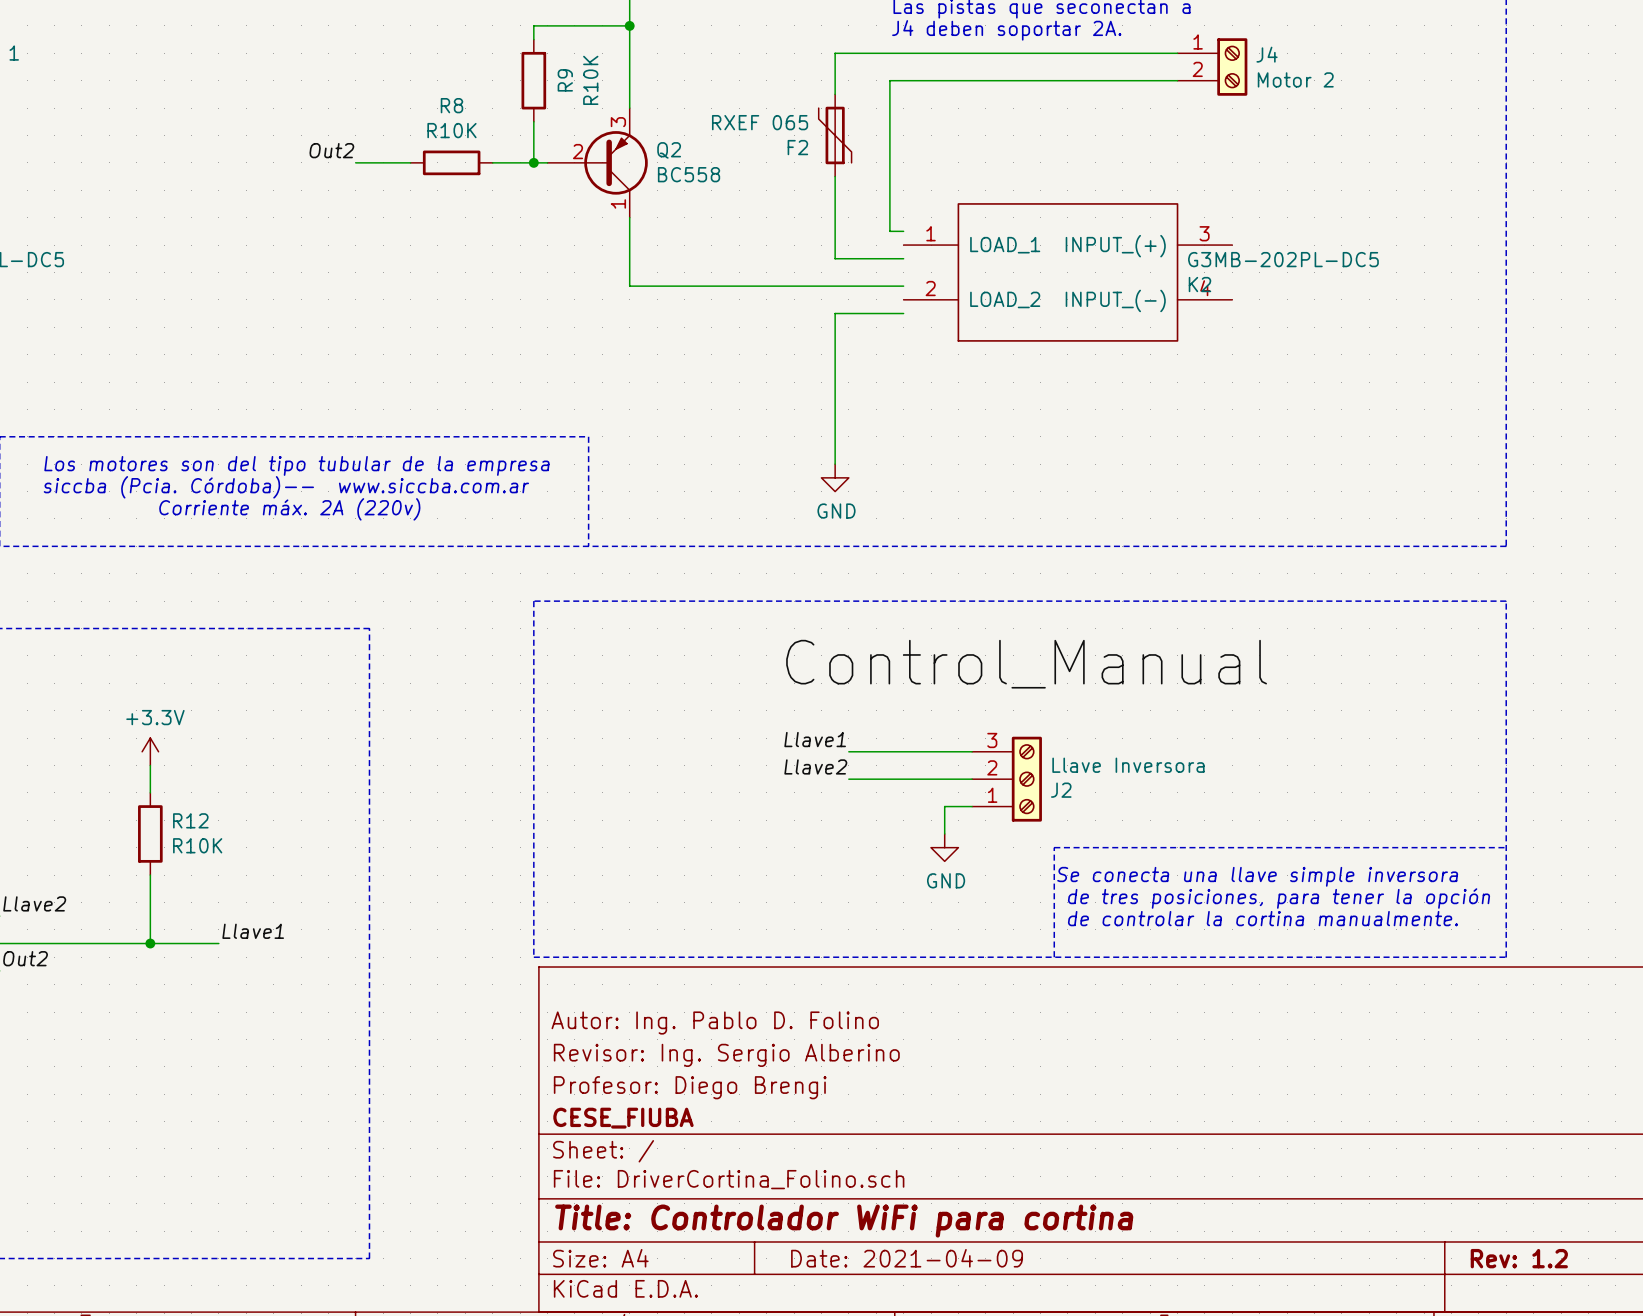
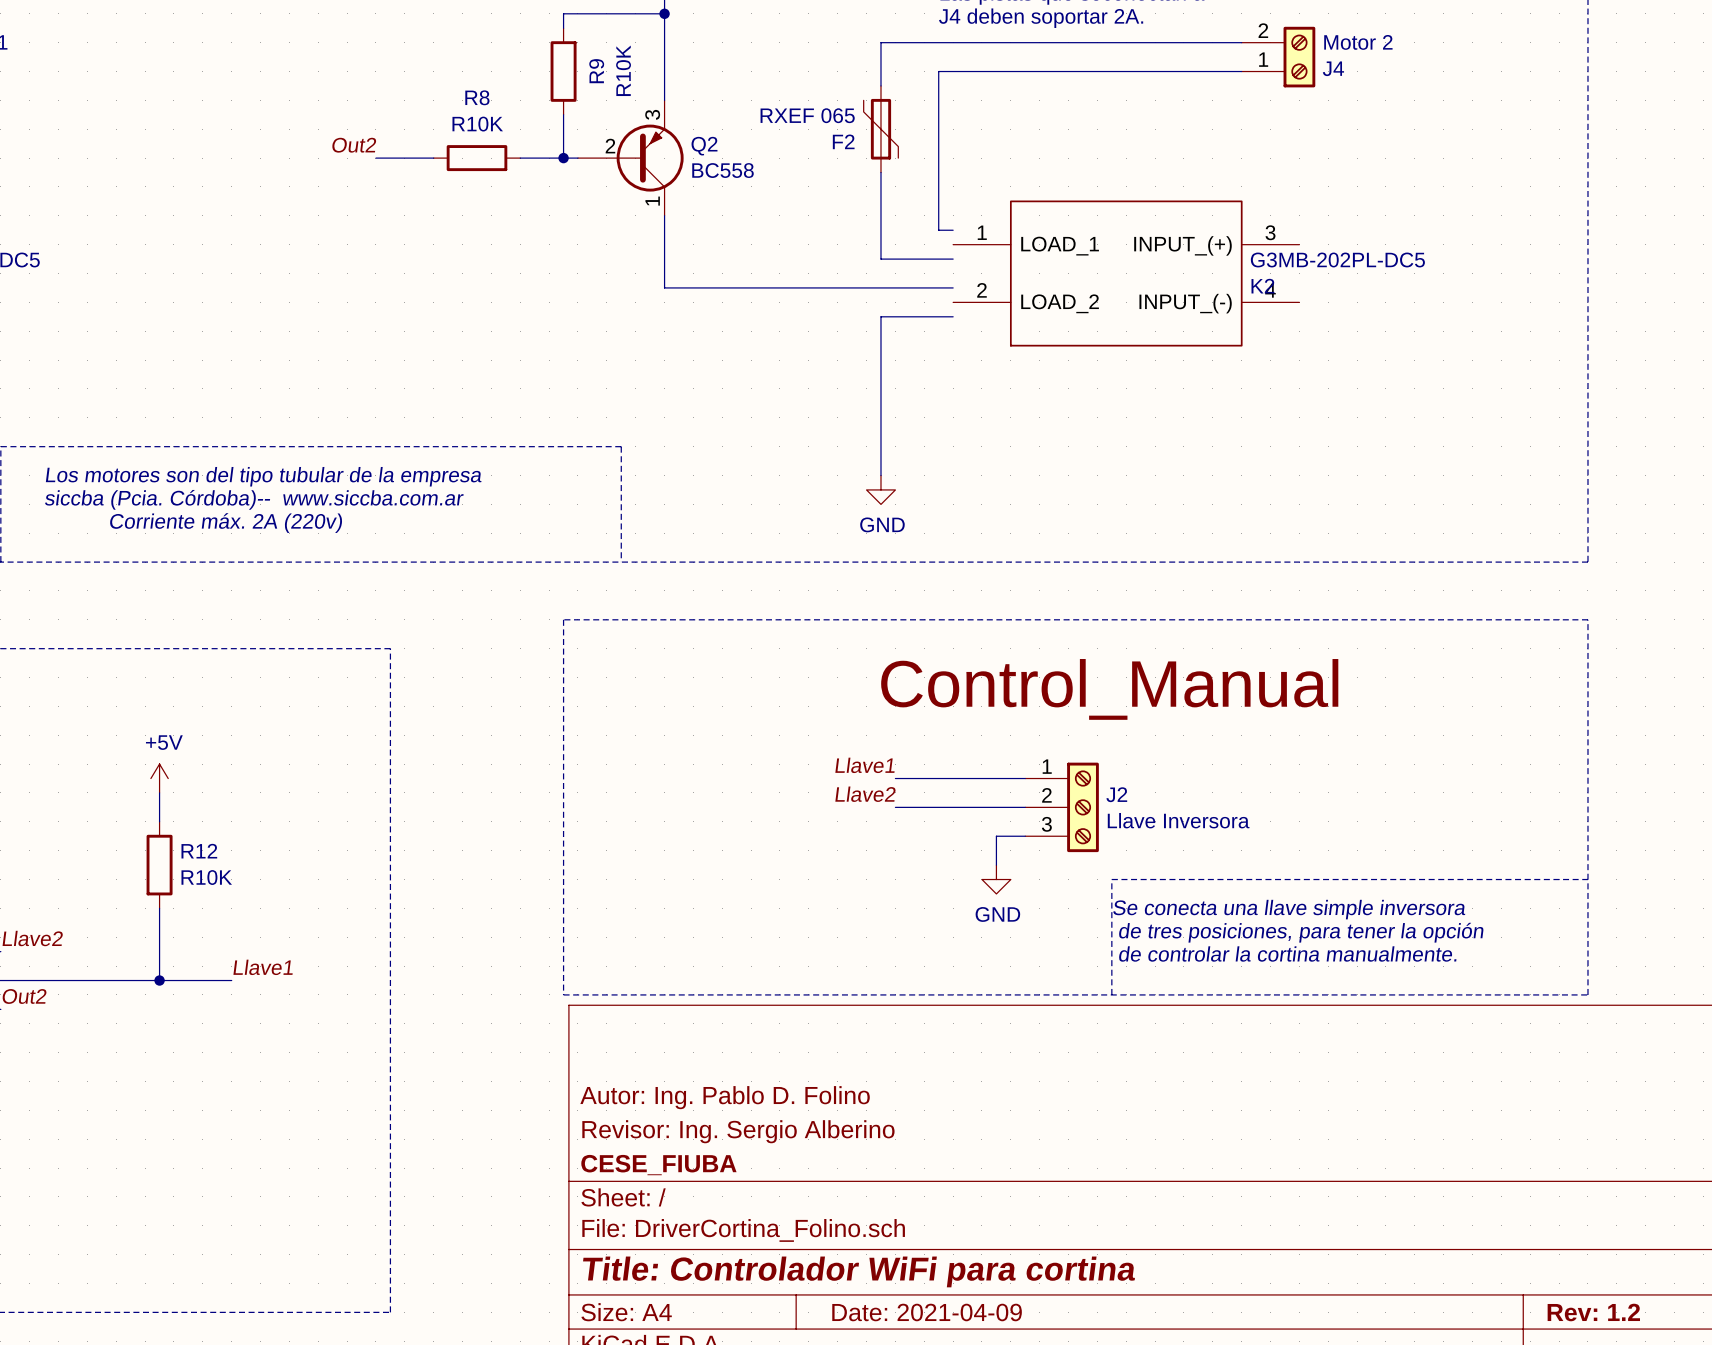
J4 flip: as is (1232, 67) -> up-down (1299, 57)
power symbol: +3.3V (150, 751) -> +5V (159, 778)
J2 flip: as is (1026, 779) -> up-down (1082, 807)
title block: Autor: Ing. Pablo D. Folino (715, 1023) -> none
title block: Revisor: Ing. Sergio Alberino (726, 1055) -> Autor: Ing. Pablo D. Folino (725, 1097)
title block: Profesor: Diego Brengi (690, 1087) -> Revisor: Ing. Sergio Alberino (738, 1131)

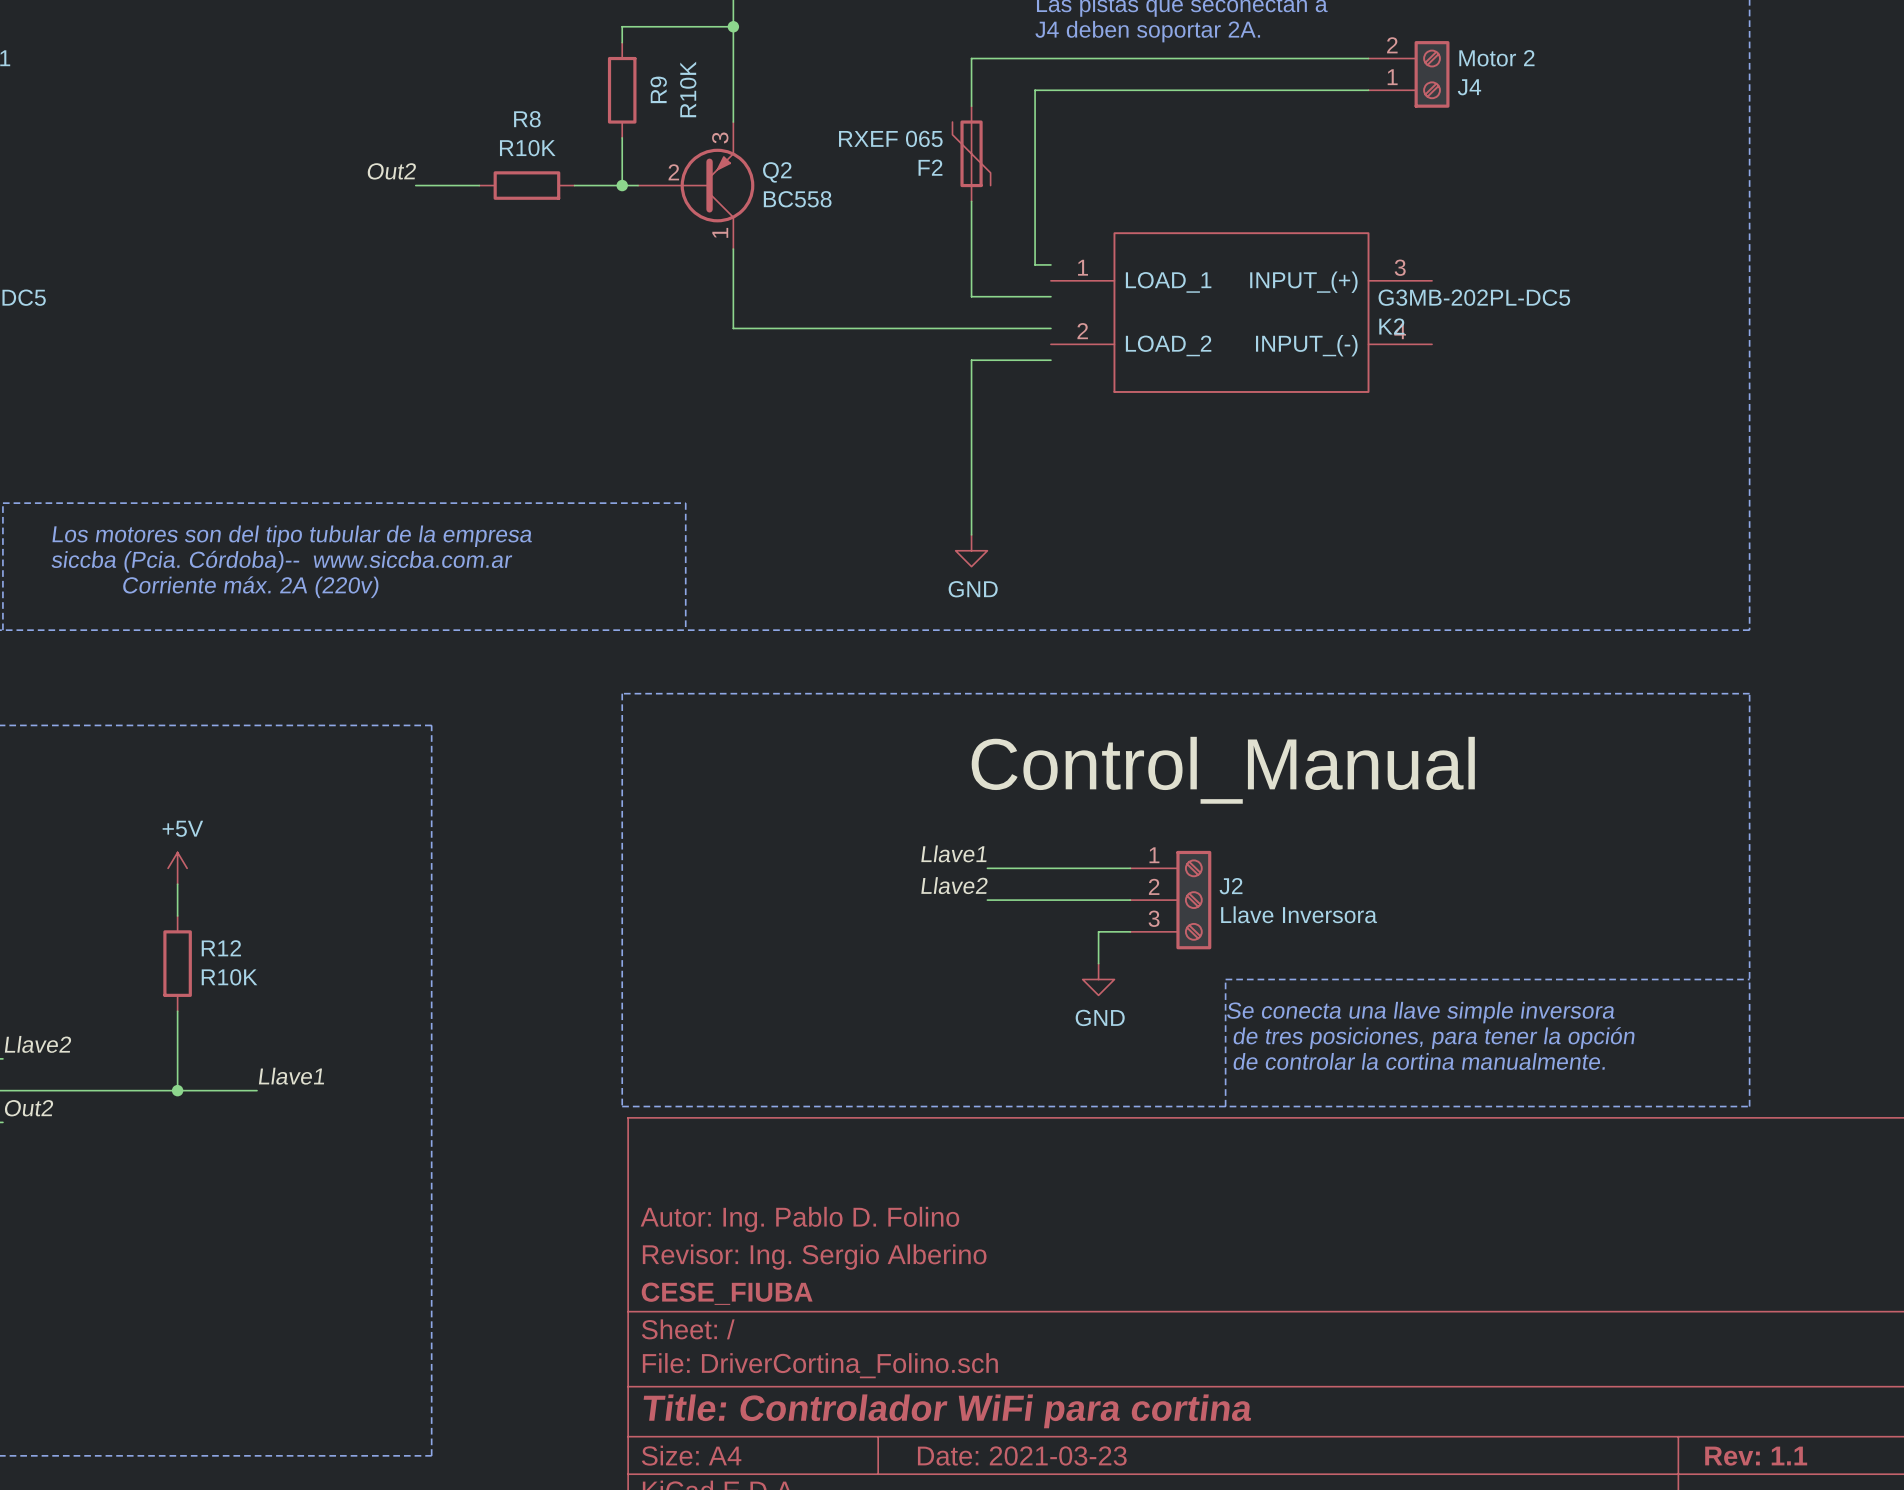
title block: Date: 2021-04-09 (927, 1312) -> Date: 2021-03-23 (1022, 1455)
title block: Rev: 1.2 (1593, 1312) -> Rev: 1.1 (1756, 1456)

